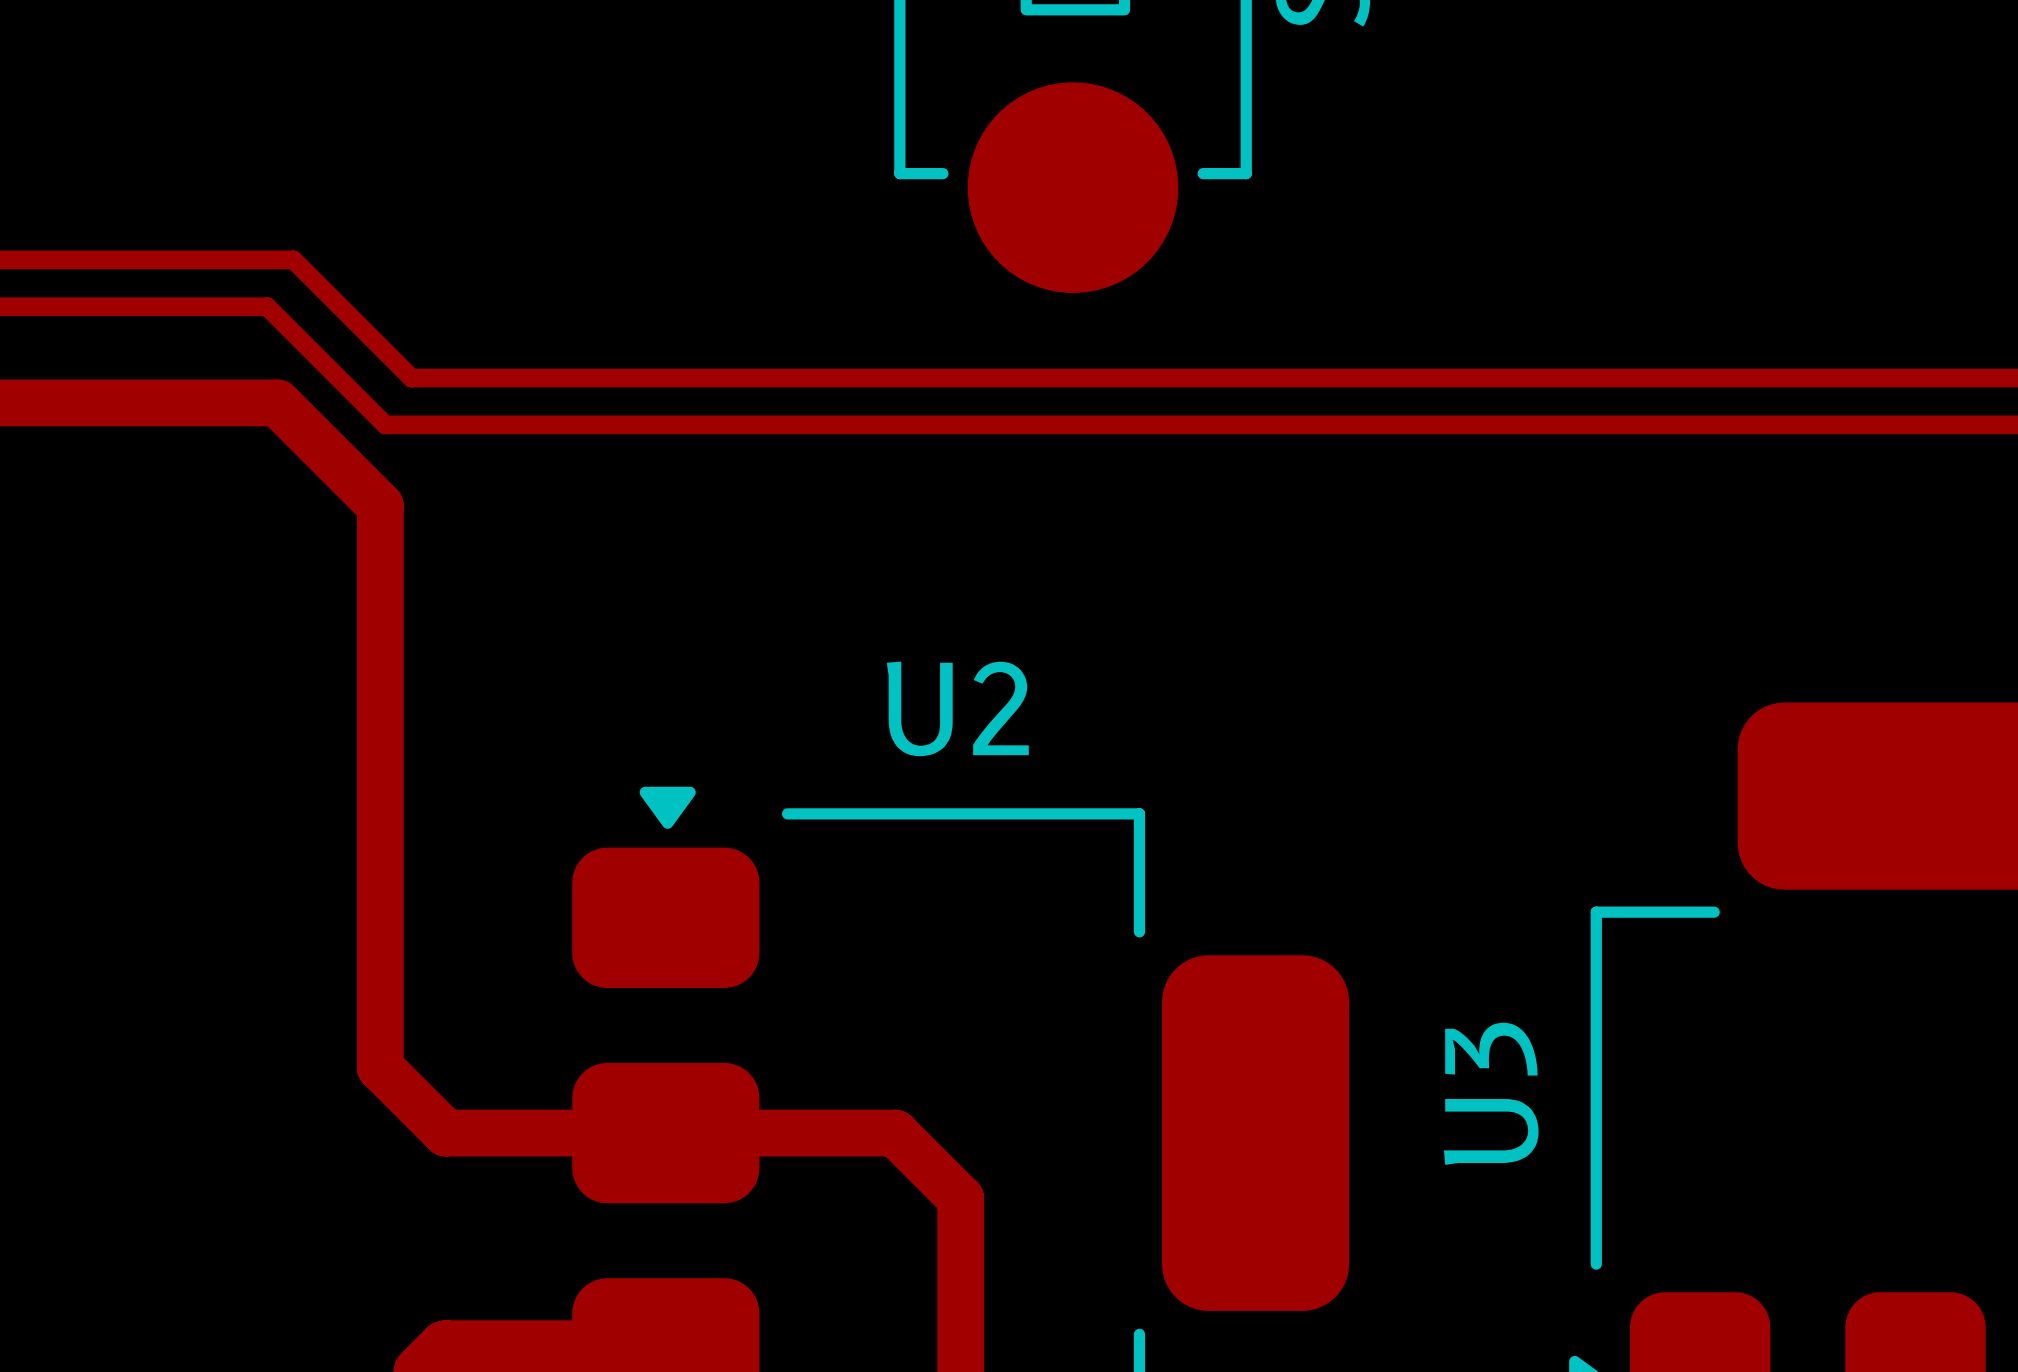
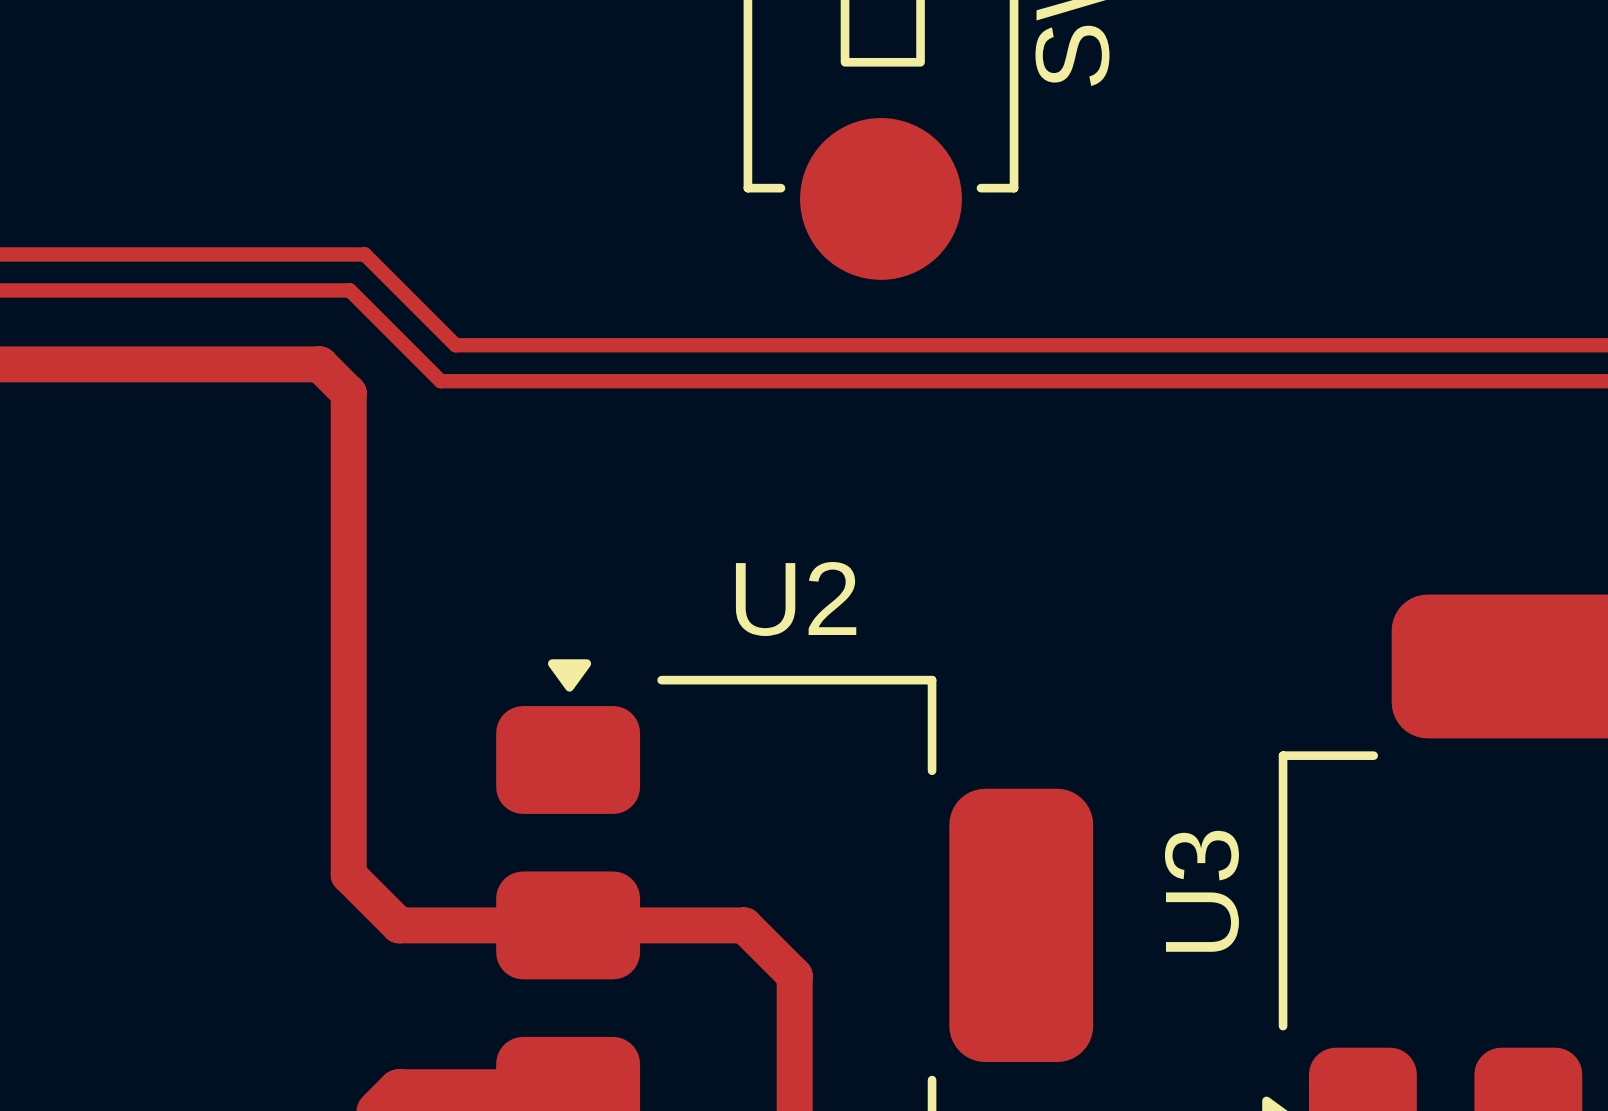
track: (293, 259) (411, 378) (519, 378) -> (281, 254) (364, 254) (455, 345)
track: (267, 306) (385, 424) (500, 424) -> (261, 290) (349, 290) (440, 381)
track: (277, 402) (380, 505) -> (269, 364) (319, 364) (348, 393) (348, 443)

